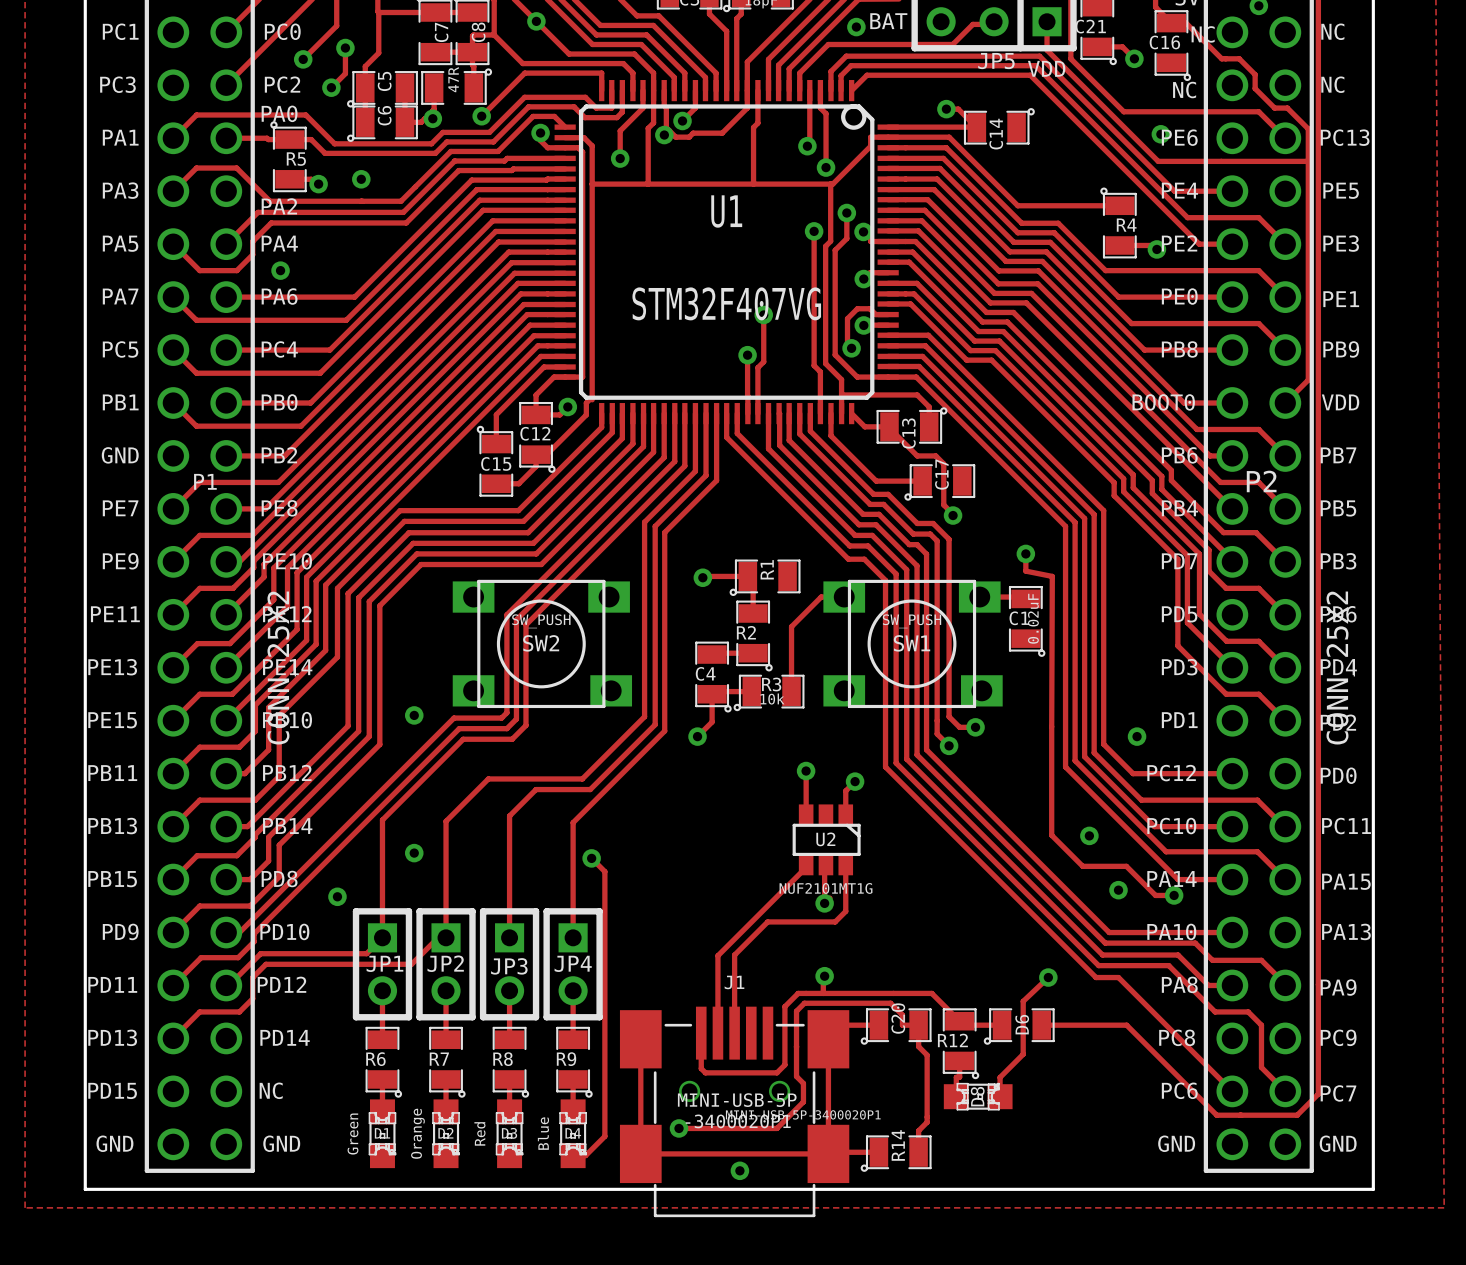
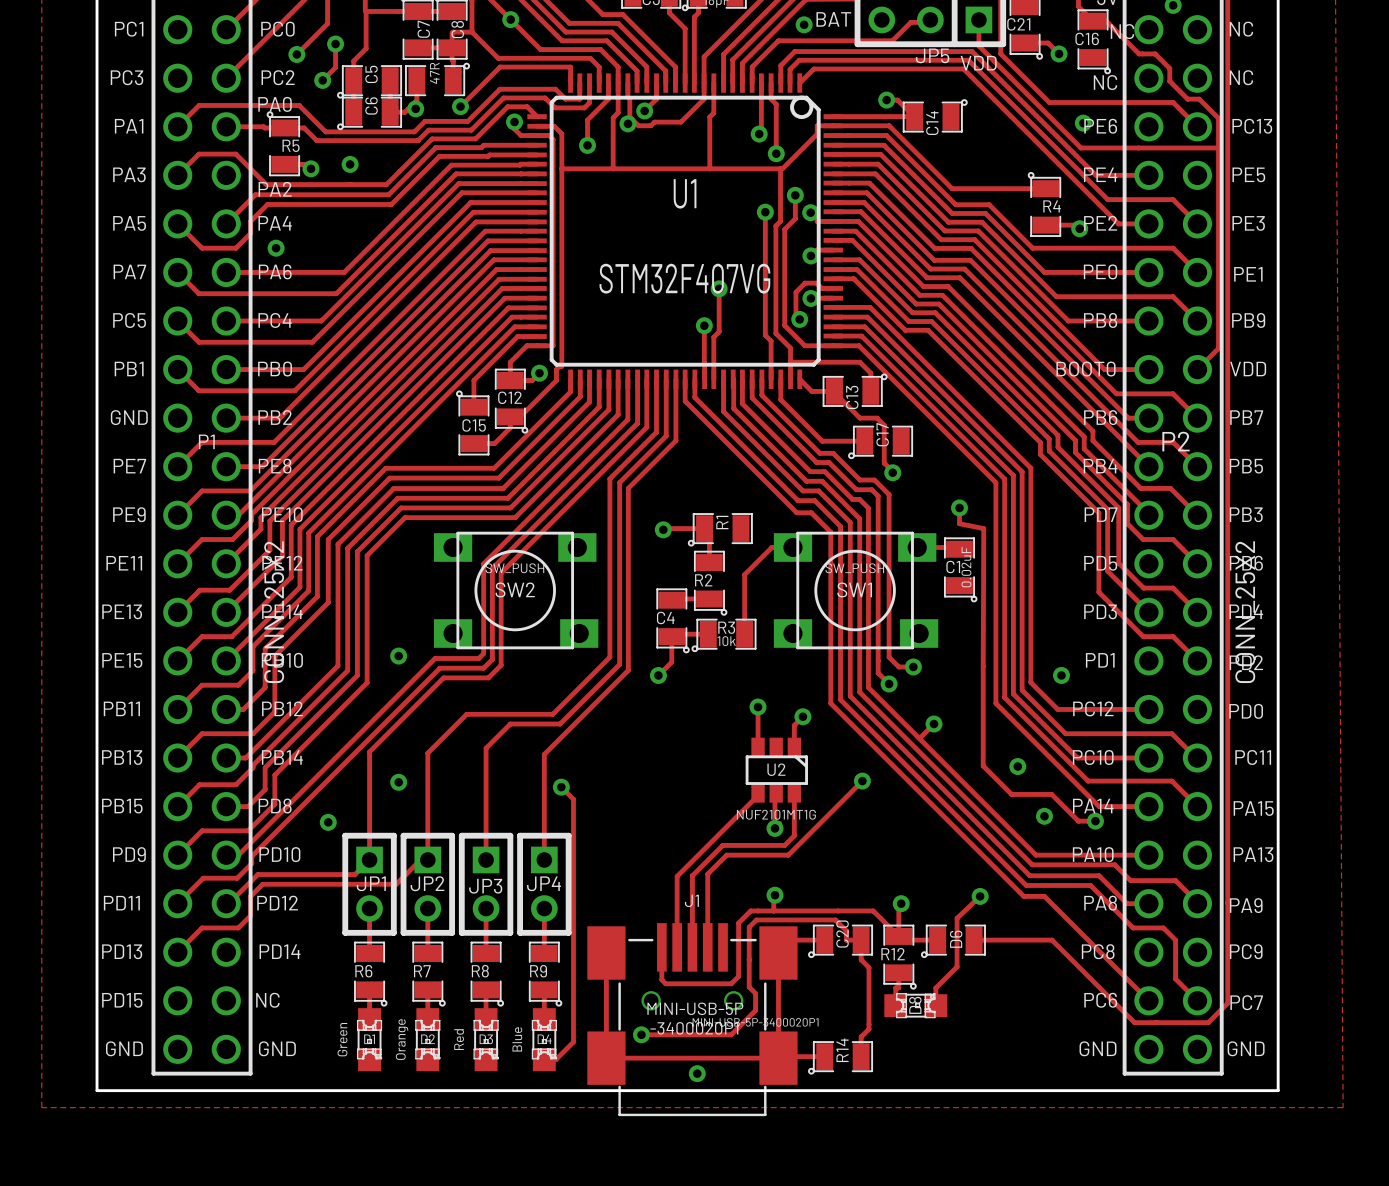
track: none -> (934, 724) (920, 737) (918, 737)
via: none -> (934, 724)
track: none -> (862, 781) (788, 855) (726, 855) (707, 874) (707, 947)
via: none -> (862, 781)
track: none -> (901, 903) (898, 906) (898, 936)
via: none -> (901, 903)

